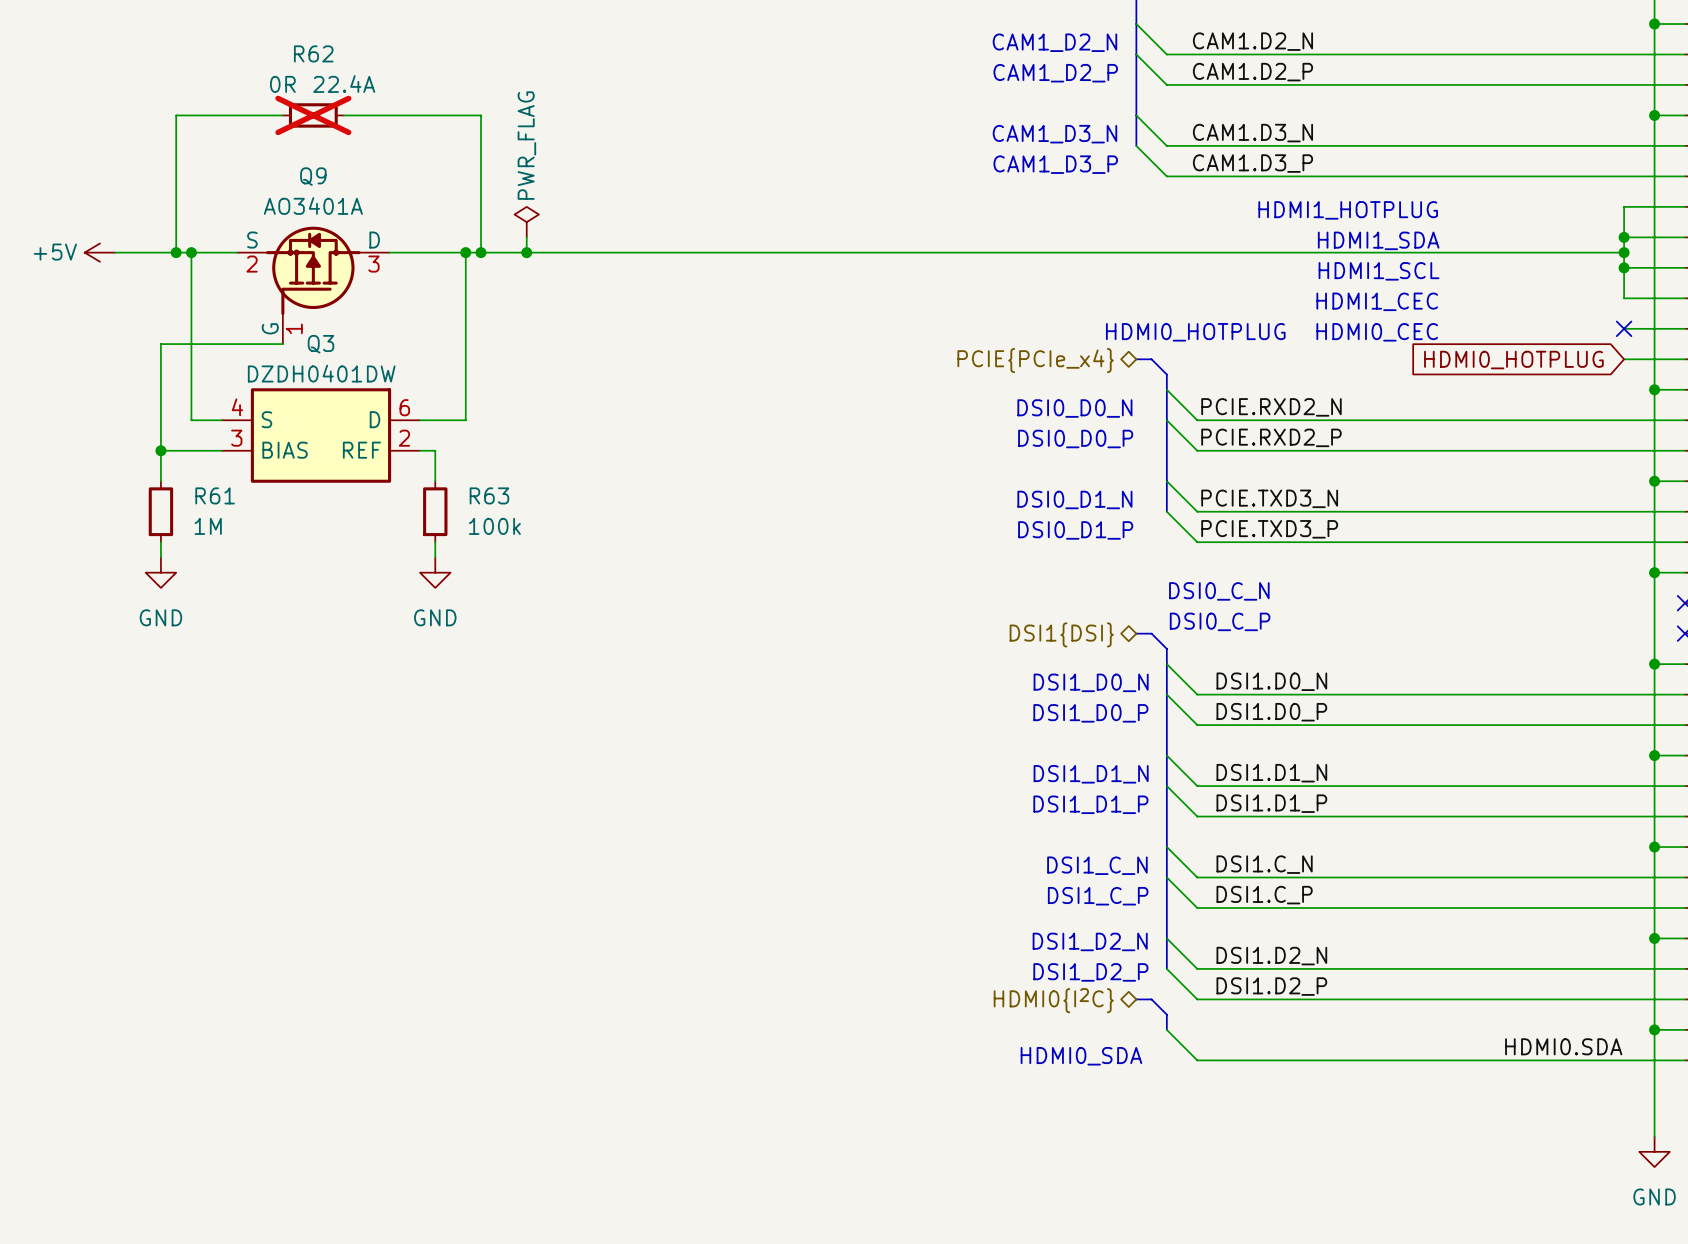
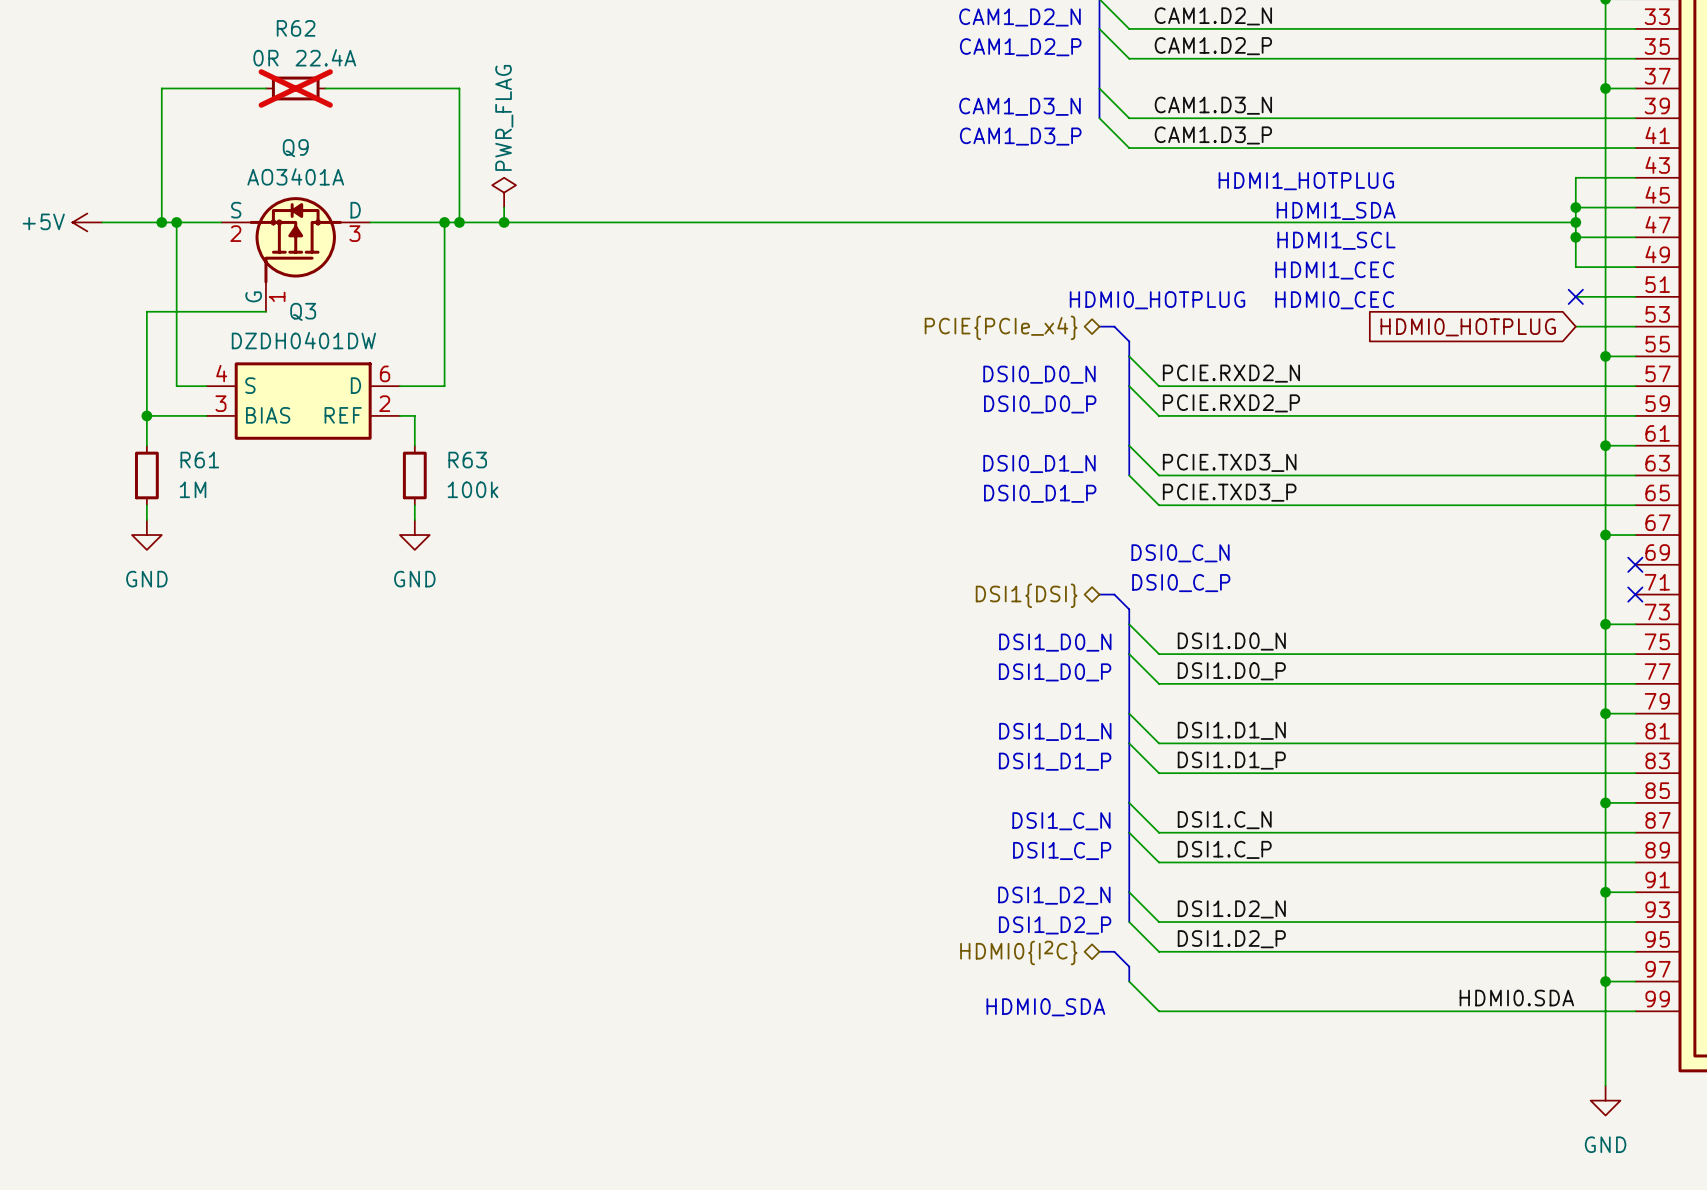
Q3 symbol: [221, 388, 421, 483] -> [206, 362, 400, 440]

